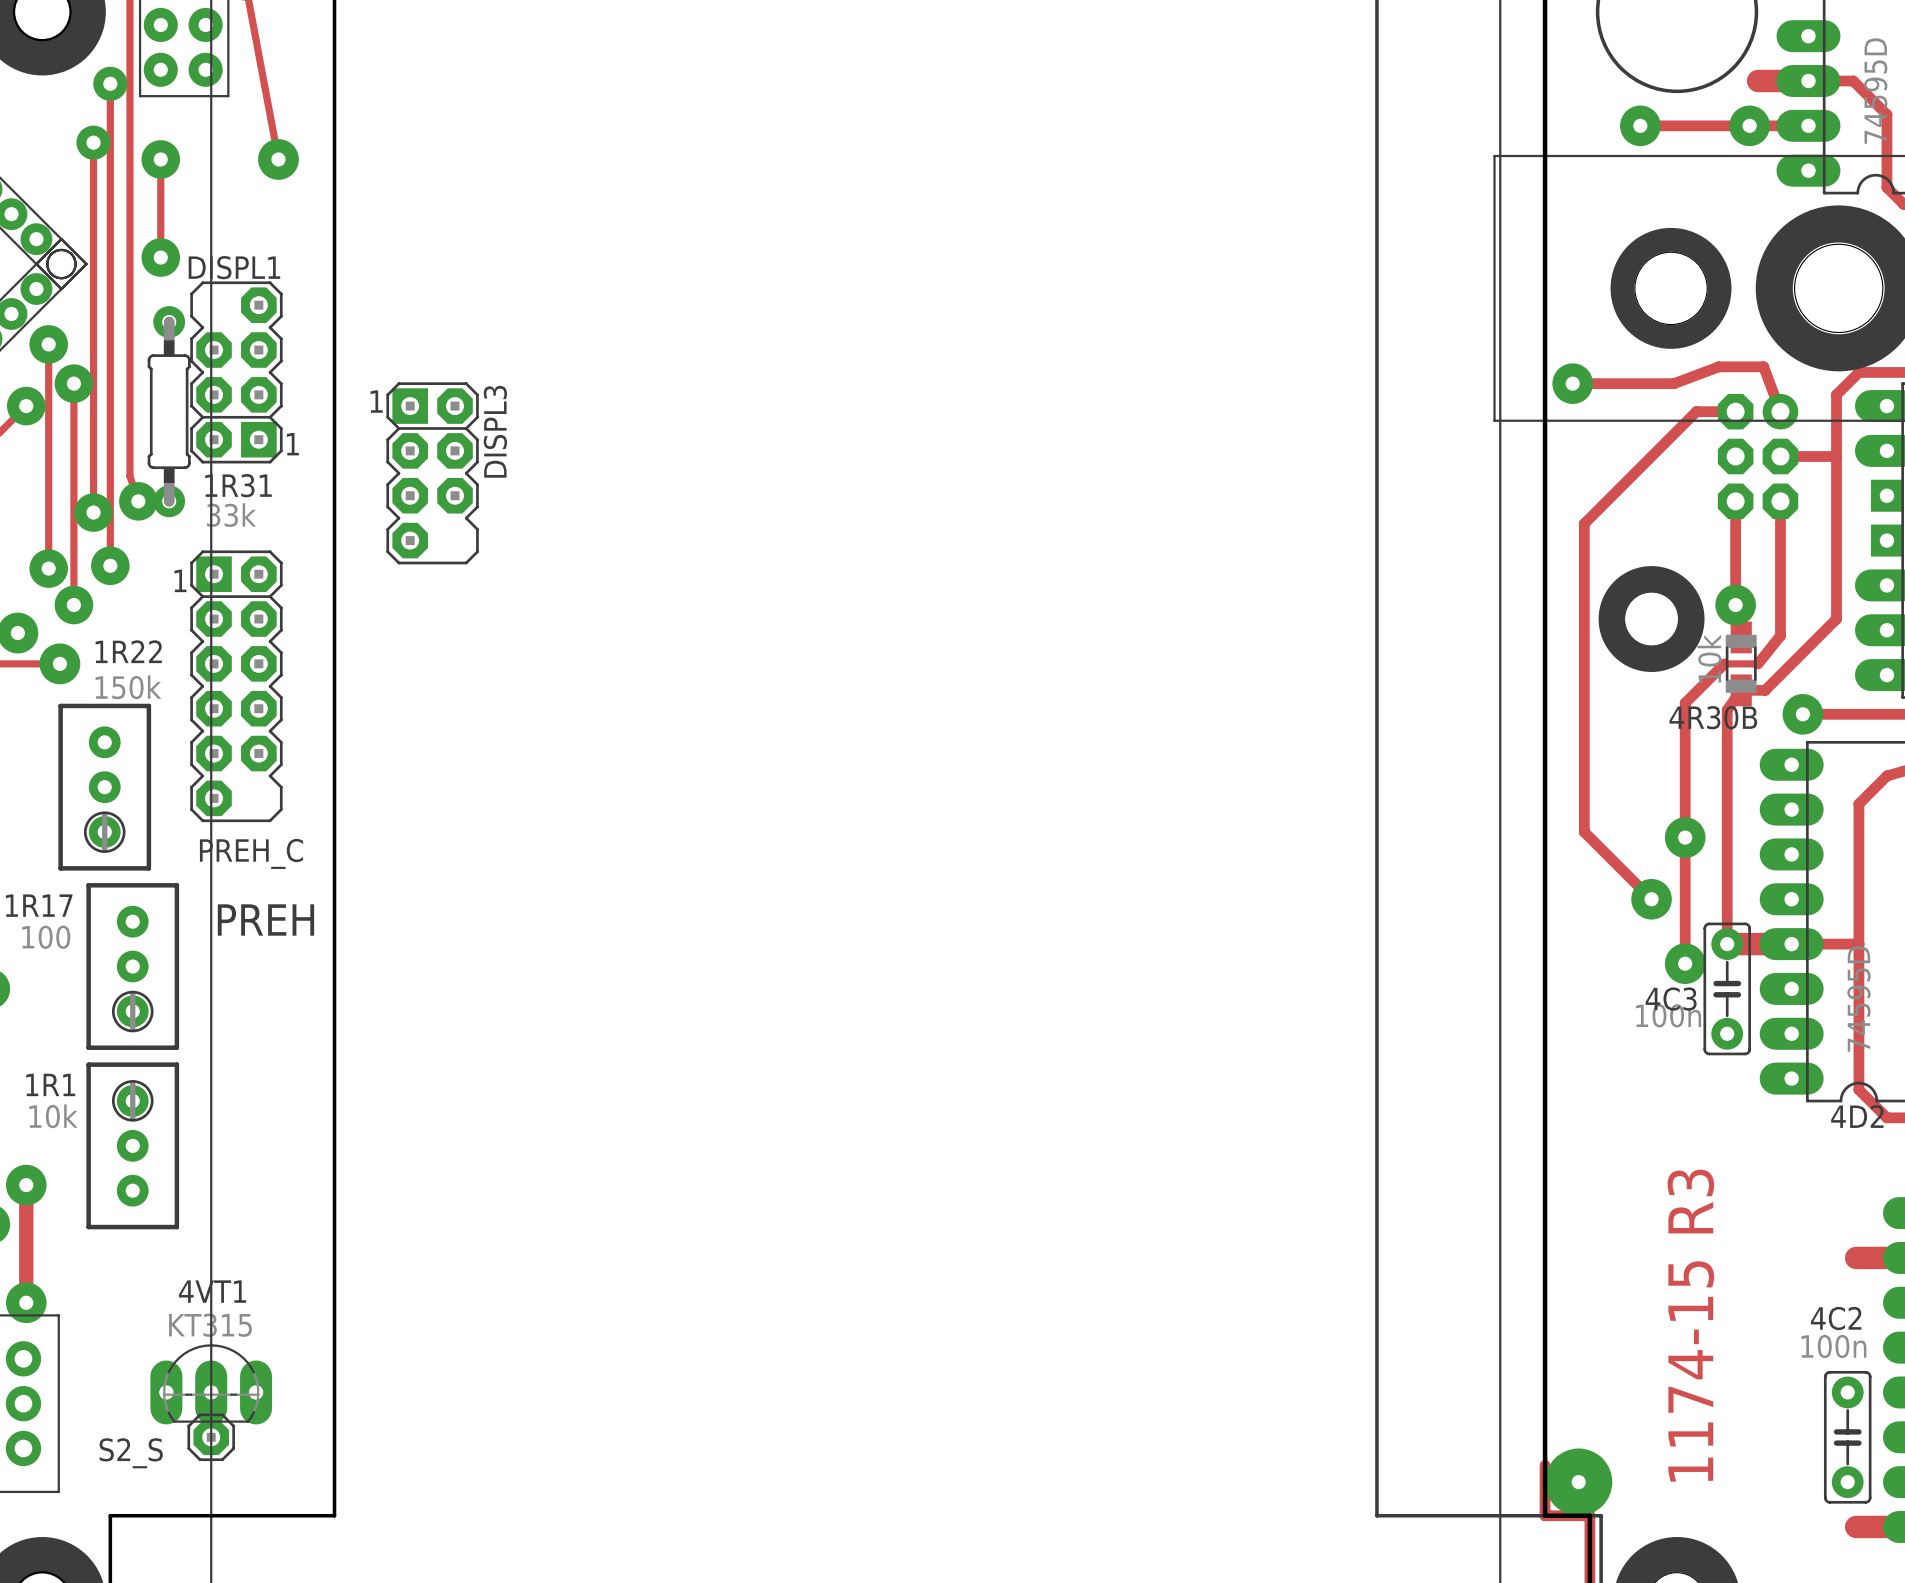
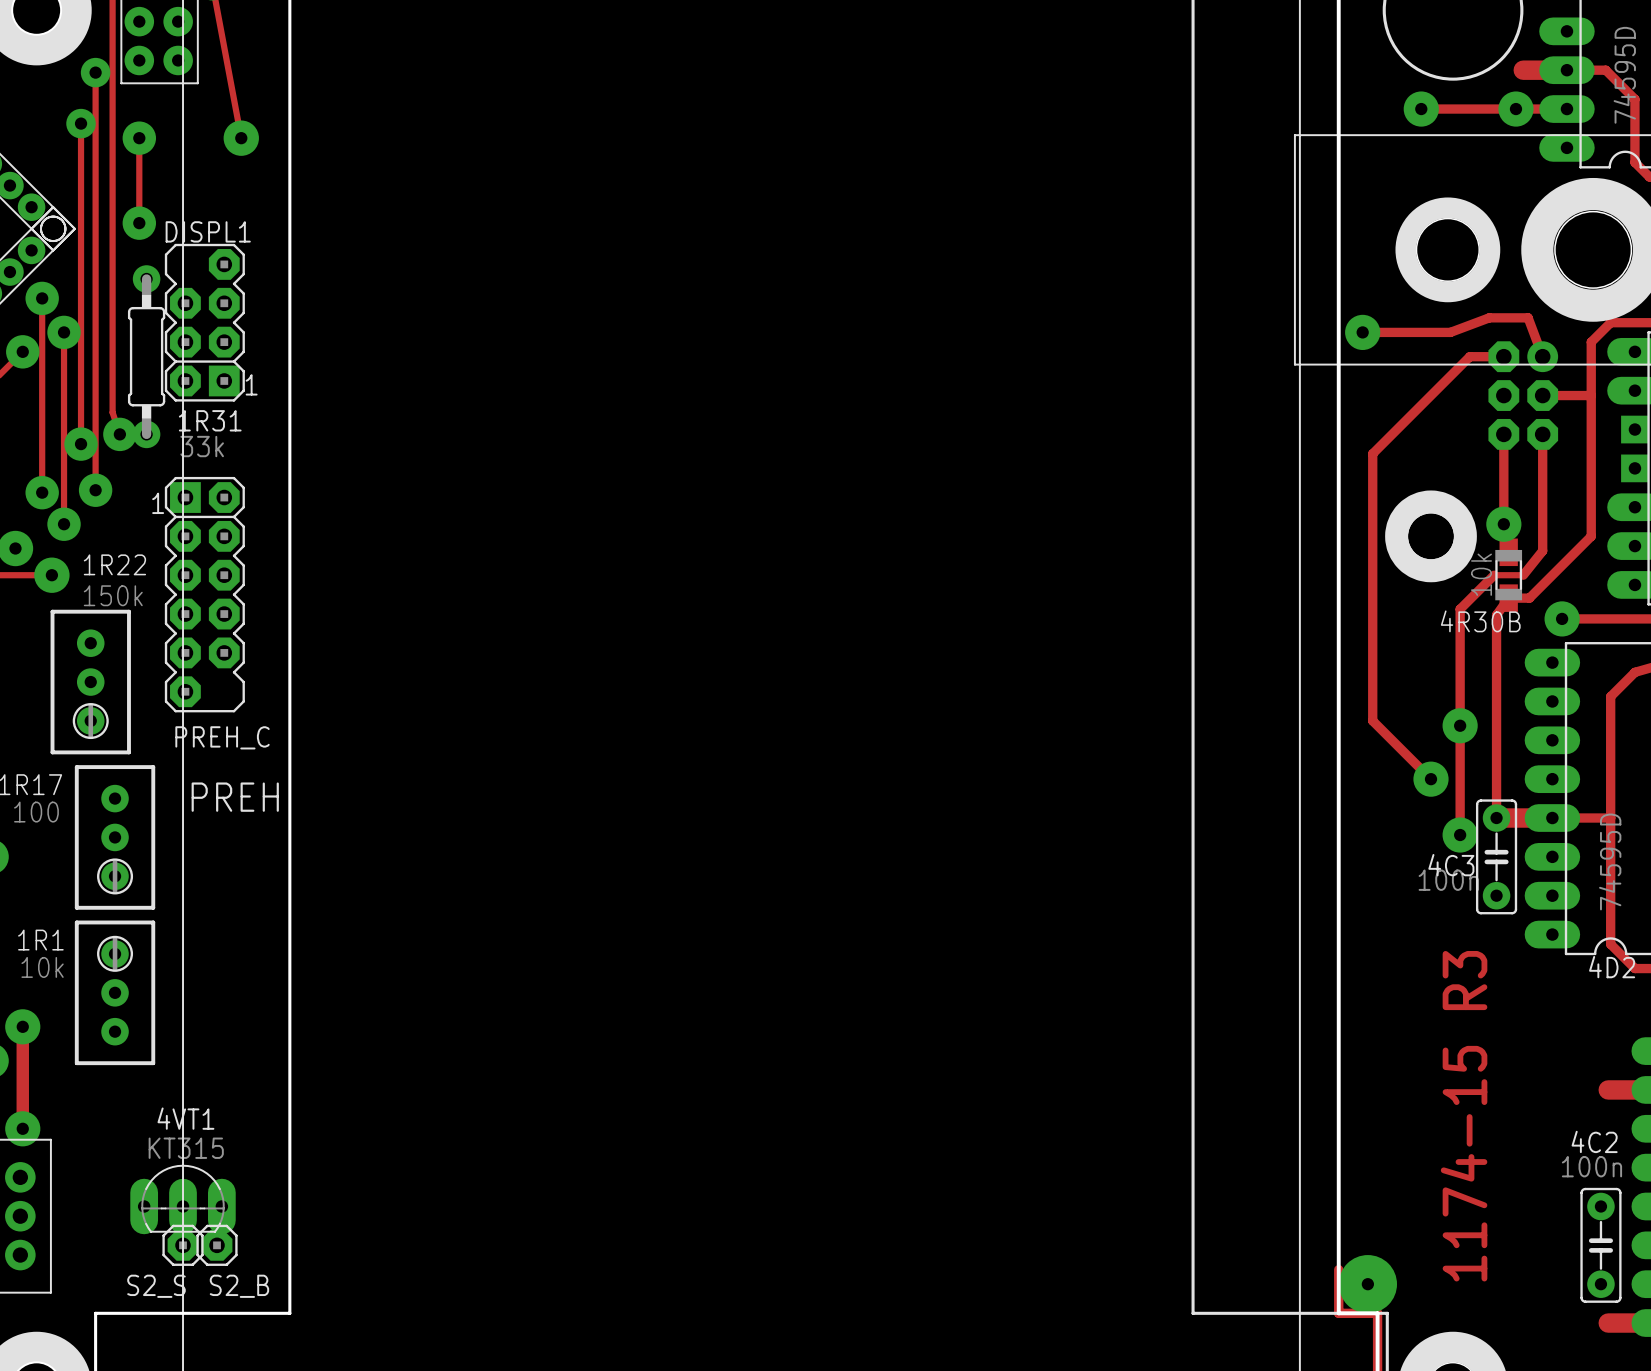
DISPL3: (432, 473) -> none
S2_B: none -> (217, 1245)
S2_S name position: S2_S (131, 1453) -> S2_S (156, 1286)

